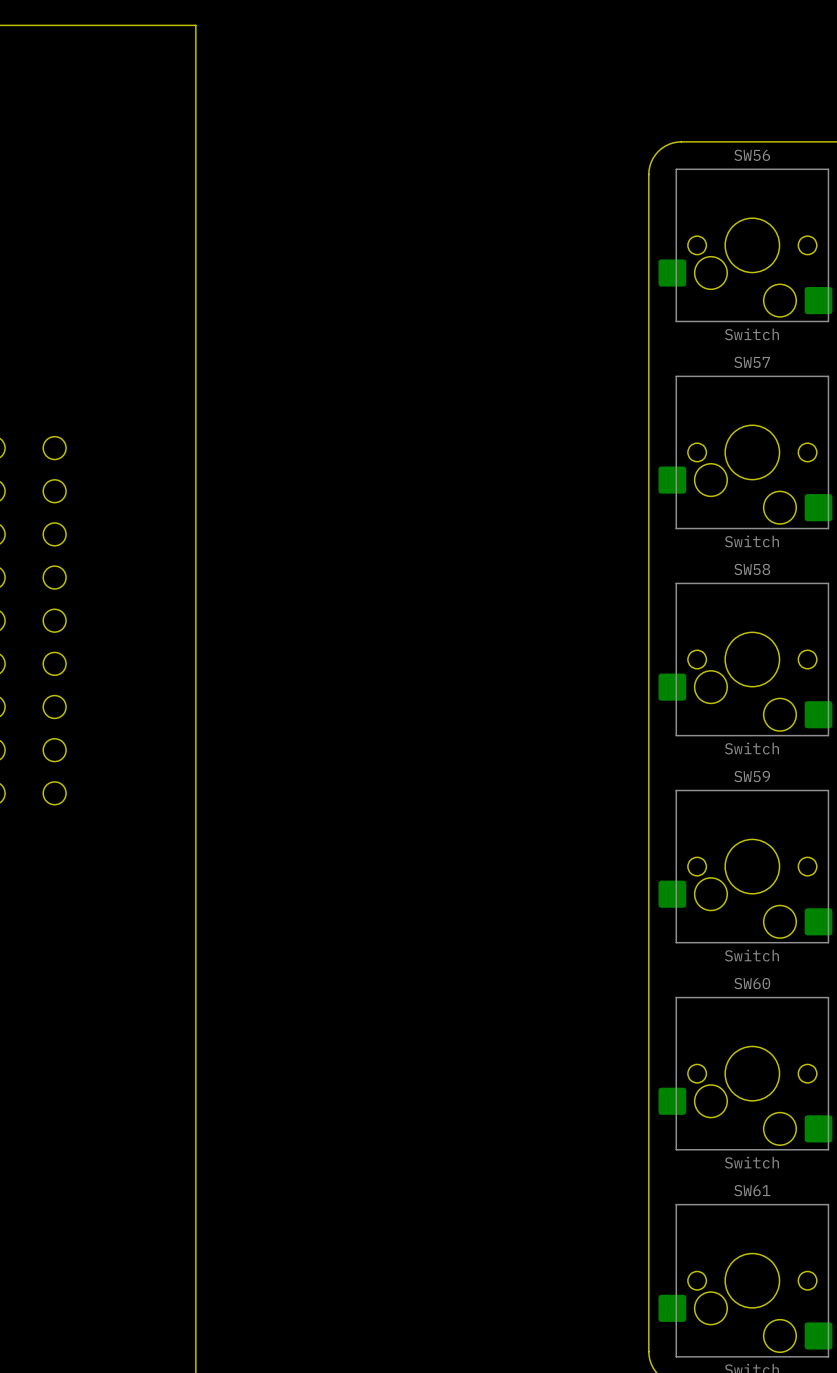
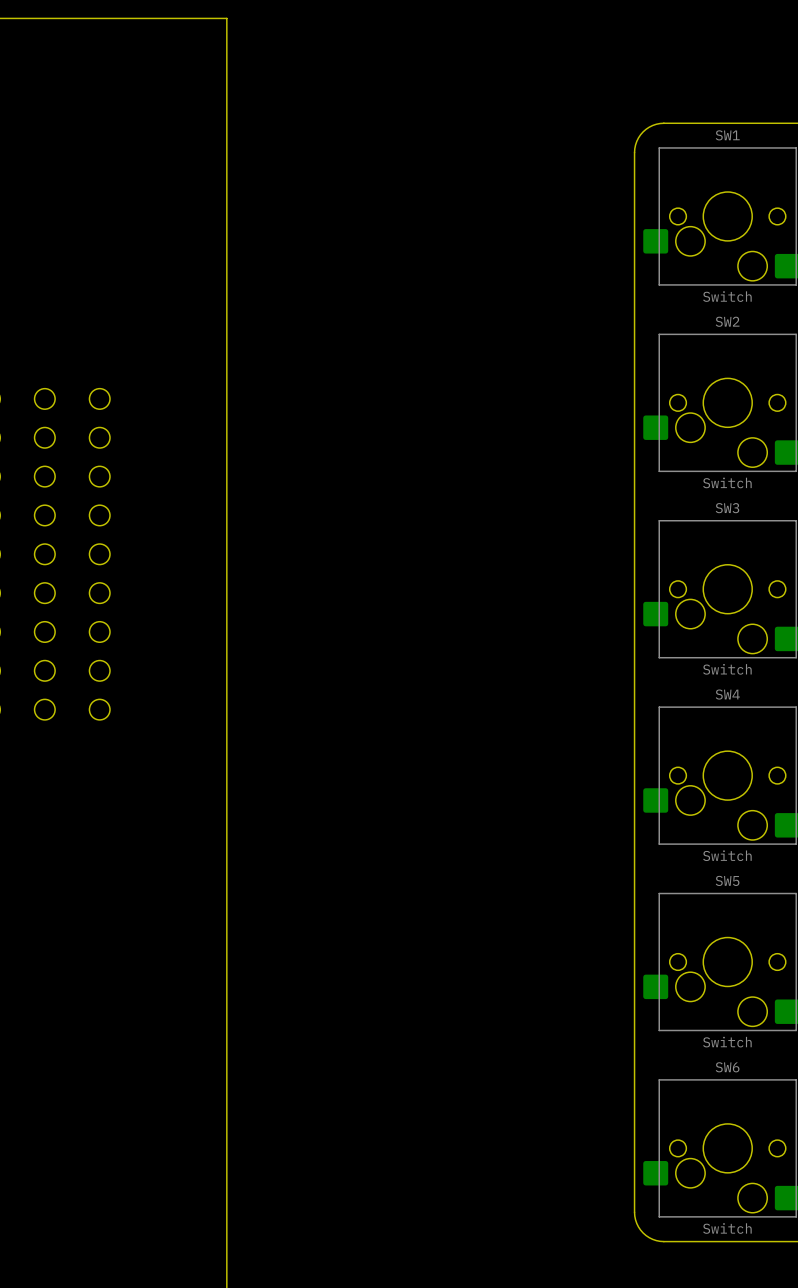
SW56 name: SW56 (752, 155) -> SW1 (727, 135)
SW57 name: SW57 (752, 362) -> SW2 (727, 321)
SW58 name: SW58 (752, 569) -> SW3 (727, 508)
SW59 name: SW59 (752, 776) -> SW4 (727, 694)
SW60 name: SW60 (752, 983) -> SW5 (727, 880)
SW61 name: SW61 (752, 1190) -> SW6 (727, 1067)

